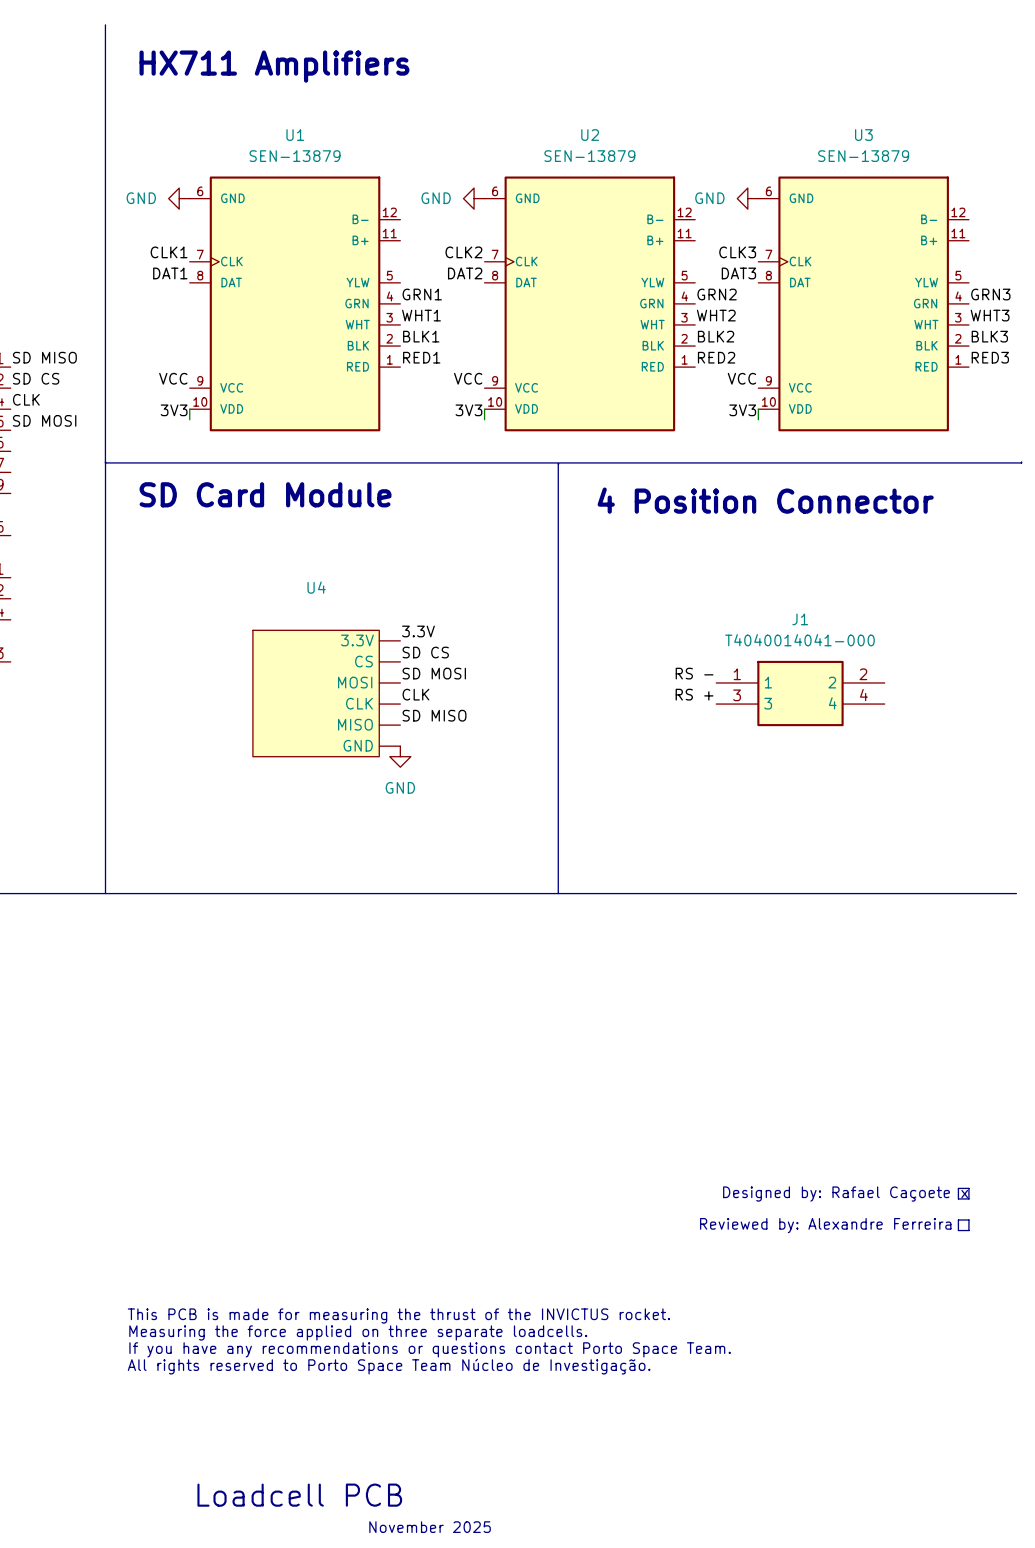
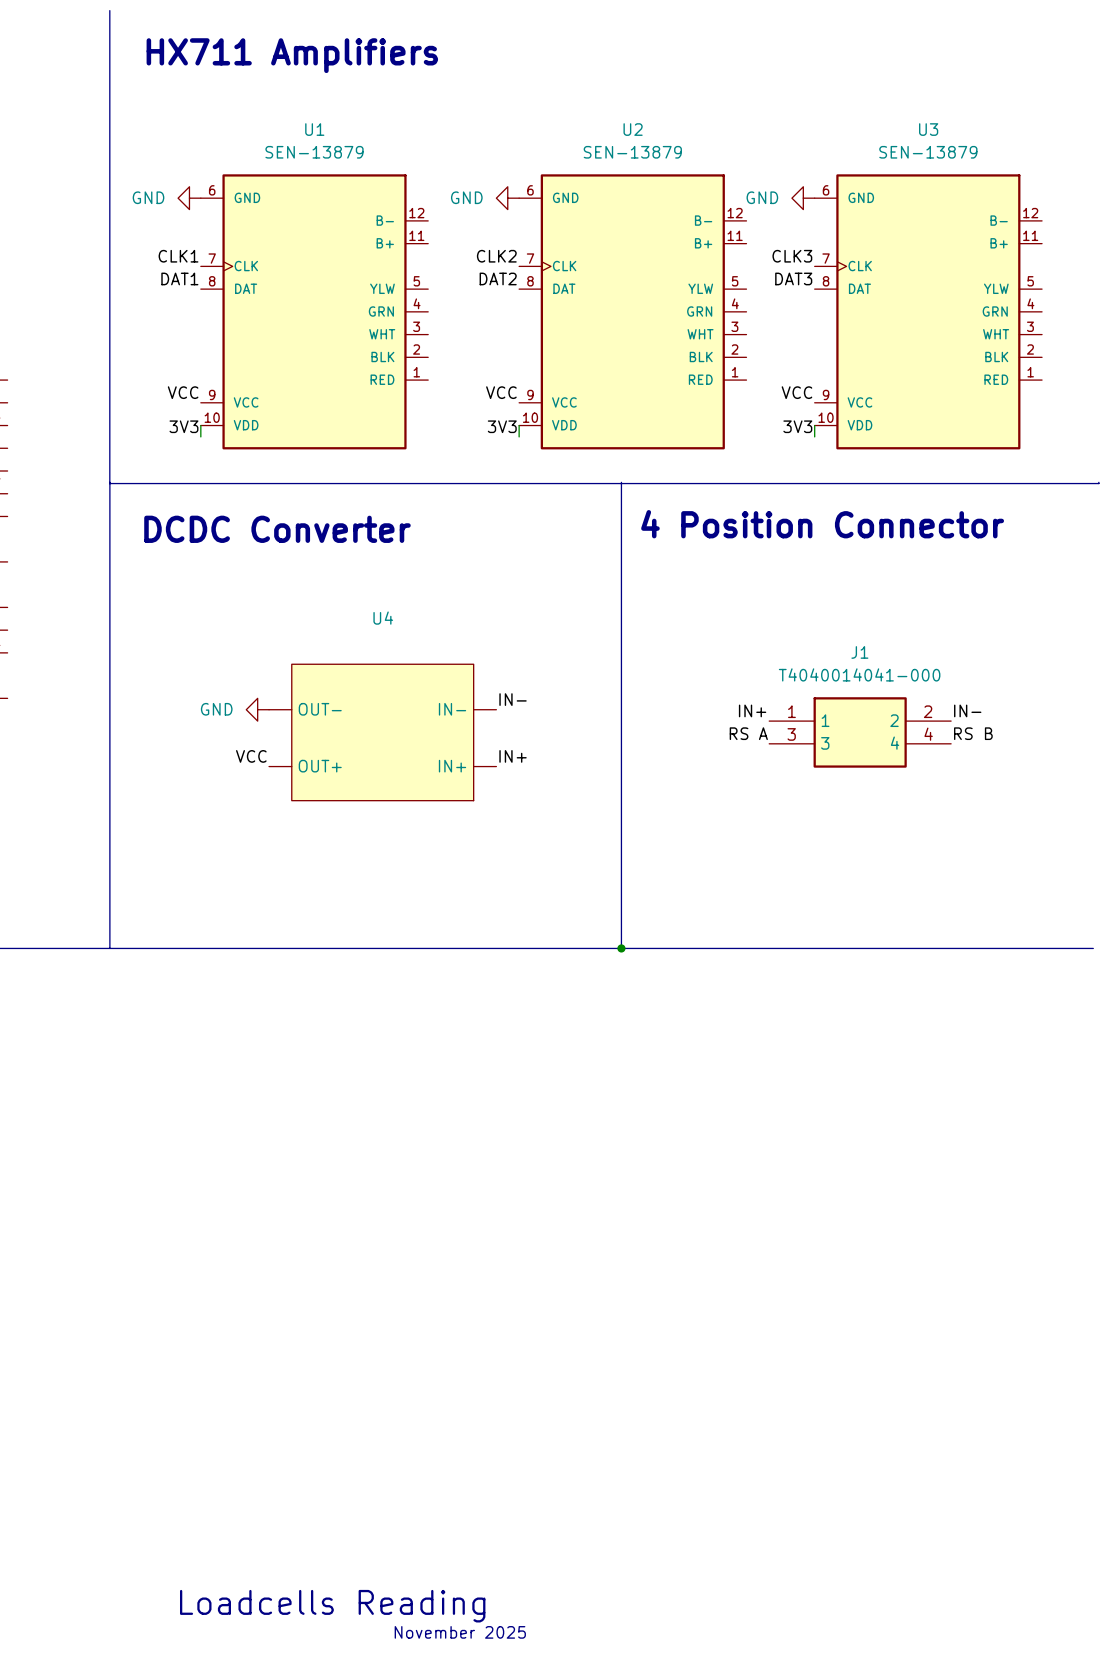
label: GRN1 (422, 294) -> none
label: GRN2 (717, 294) -> none
label: GRN3 (990, 294) -> none
label: WHT1 (421, 315) -> none
label: WHT2 (716, 315) -> none
label: WHT3 (990, 315) -> none
label: BLK1 (421, 336) -> none
label: BLK2 (716, 336) -> none
label: BLK3 (989, 336) -> none
label: SD MISO (44, 357) -> none
label: RED1 (421, 357) -> none
label: RED2 (716, 357) -> none
label: RED3 (990, 357) -> none
label: SD CS (36, 378) -> none
label: CLK (26, 399) -> none
label: SD MOSI (44, 420) -> none
bus: none -> (621, 482) (621, 948)
bus: (558, 464) (558, 893) -> none
text: SD Card Module (265, 494) -> none
text: none -> DCDC Converter (277, 529)
U4 symbol: [252, 630, 401, 757] -> [269, 664, 497, 801]
label: 3.3V (418, 631) -> none
label: SD CS (425, 652) -> none
label: none -> IN- (513, 699)
label: SD MOSI (434, 673) -> none
label: RS - (694, 673) -> IN+ (752, 710)
label: none -> IN- (967, 710)
label: CLK (415, 694) -> none
label: RS + (694, 694) -> RS A (748, 733)
label: none -> RS B (973, 733)
label: none -> VCC (251, 756)
label: SD MISO (434, 715) -> none
label: none -> IN+ (513, 756)
power symbol rotation: 0° (400, 756) -> 90° clockwise (257, 709)
power symbol position: GND (400, 756) -> GND (257, 709)
junction: none -> (621, 948)
bus: (958, 1188) (968, 1188) (968, 1198) (958, 1198) (958, 1188) -> none
text: Designed by: Rafael Caçoete (836, 1194) -> none
text: x (964, 1194) -> none
bus: (958, 1220) (958, 1230) (968, 1230) (968, 1220) (958, 1220) -> none
text: Reviewed by: Alexandre Ferreira (825, 1225) -> none
text: This PCB is made for measuring the thrust of the INVICTUS rocket. (398, 1316) -> none
text: Measuring the force applied on three separate loadcells. (358, 1332) -> none
text: If you have any recommendations or questions contact Porto Space Team. (430, 1349) -> none
text: All rights reserved to Porto Space Team Núcleo de Investigação. (389, 1366) -> none
text: Loadcell PCB (299, 1495) -> Loadcells Reading (332, 1606)

